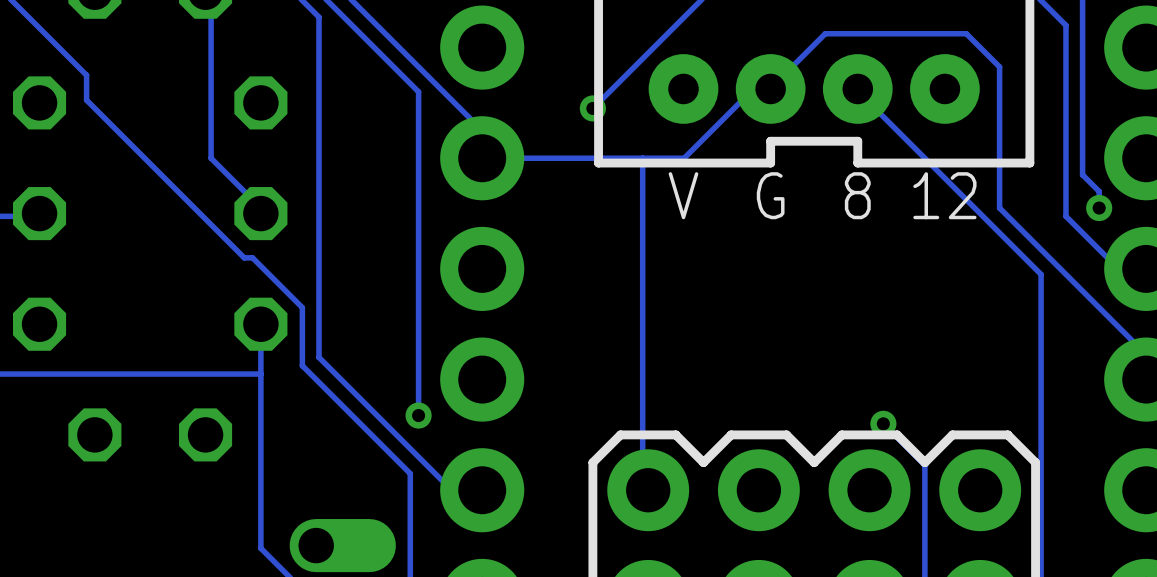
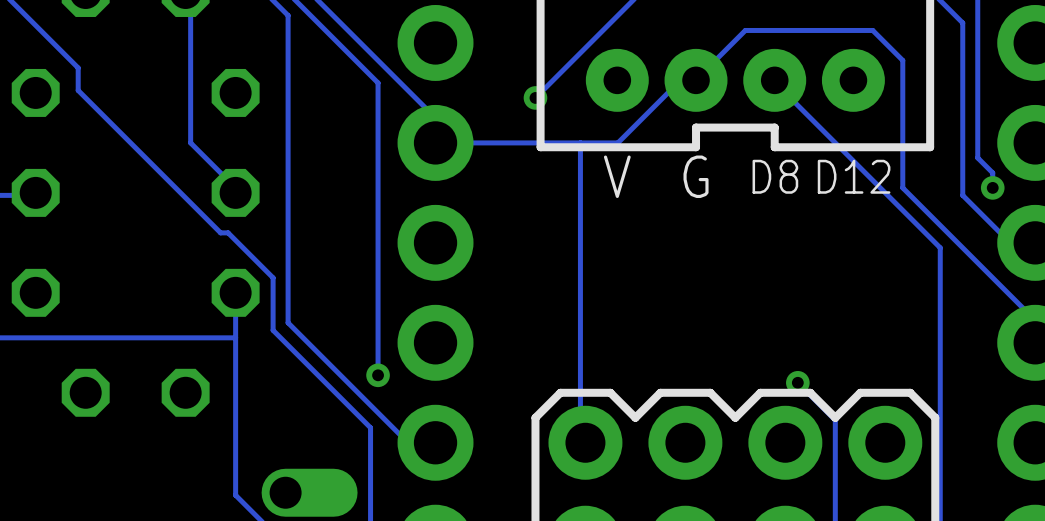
text: 8 (857, 195) -> D8 (775, 176)
text: 12 (944, 195) -> D12 (854, 176)

